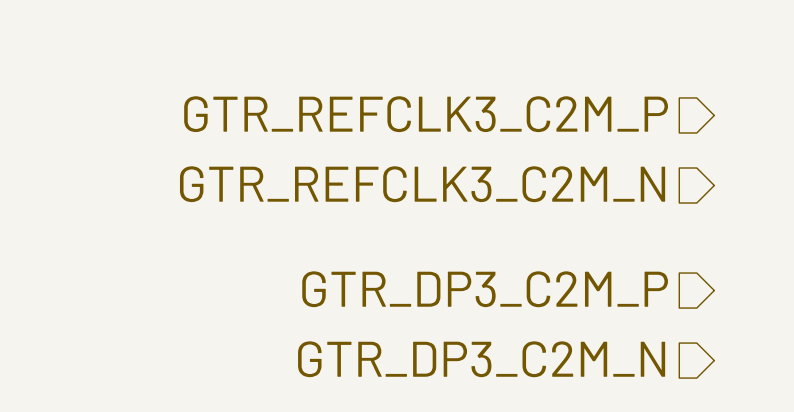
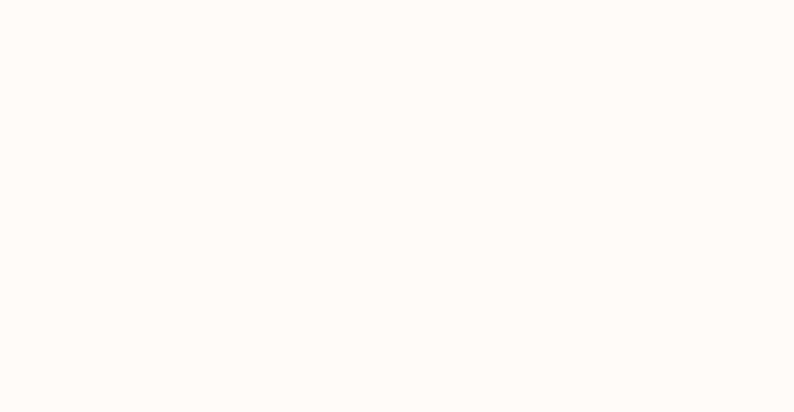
hierarchical label: GTR_REFCLK3_C2M_P (426, 114) -> none
hierarchical label: GTR_REFCLK3_C2M_N (422, 184) -> none
hierarchical label: GTR_DP3_C2M_P (485, 289) -> none
hierarchical label: GTR_DP3_C2M_N (481, 359) -> none

